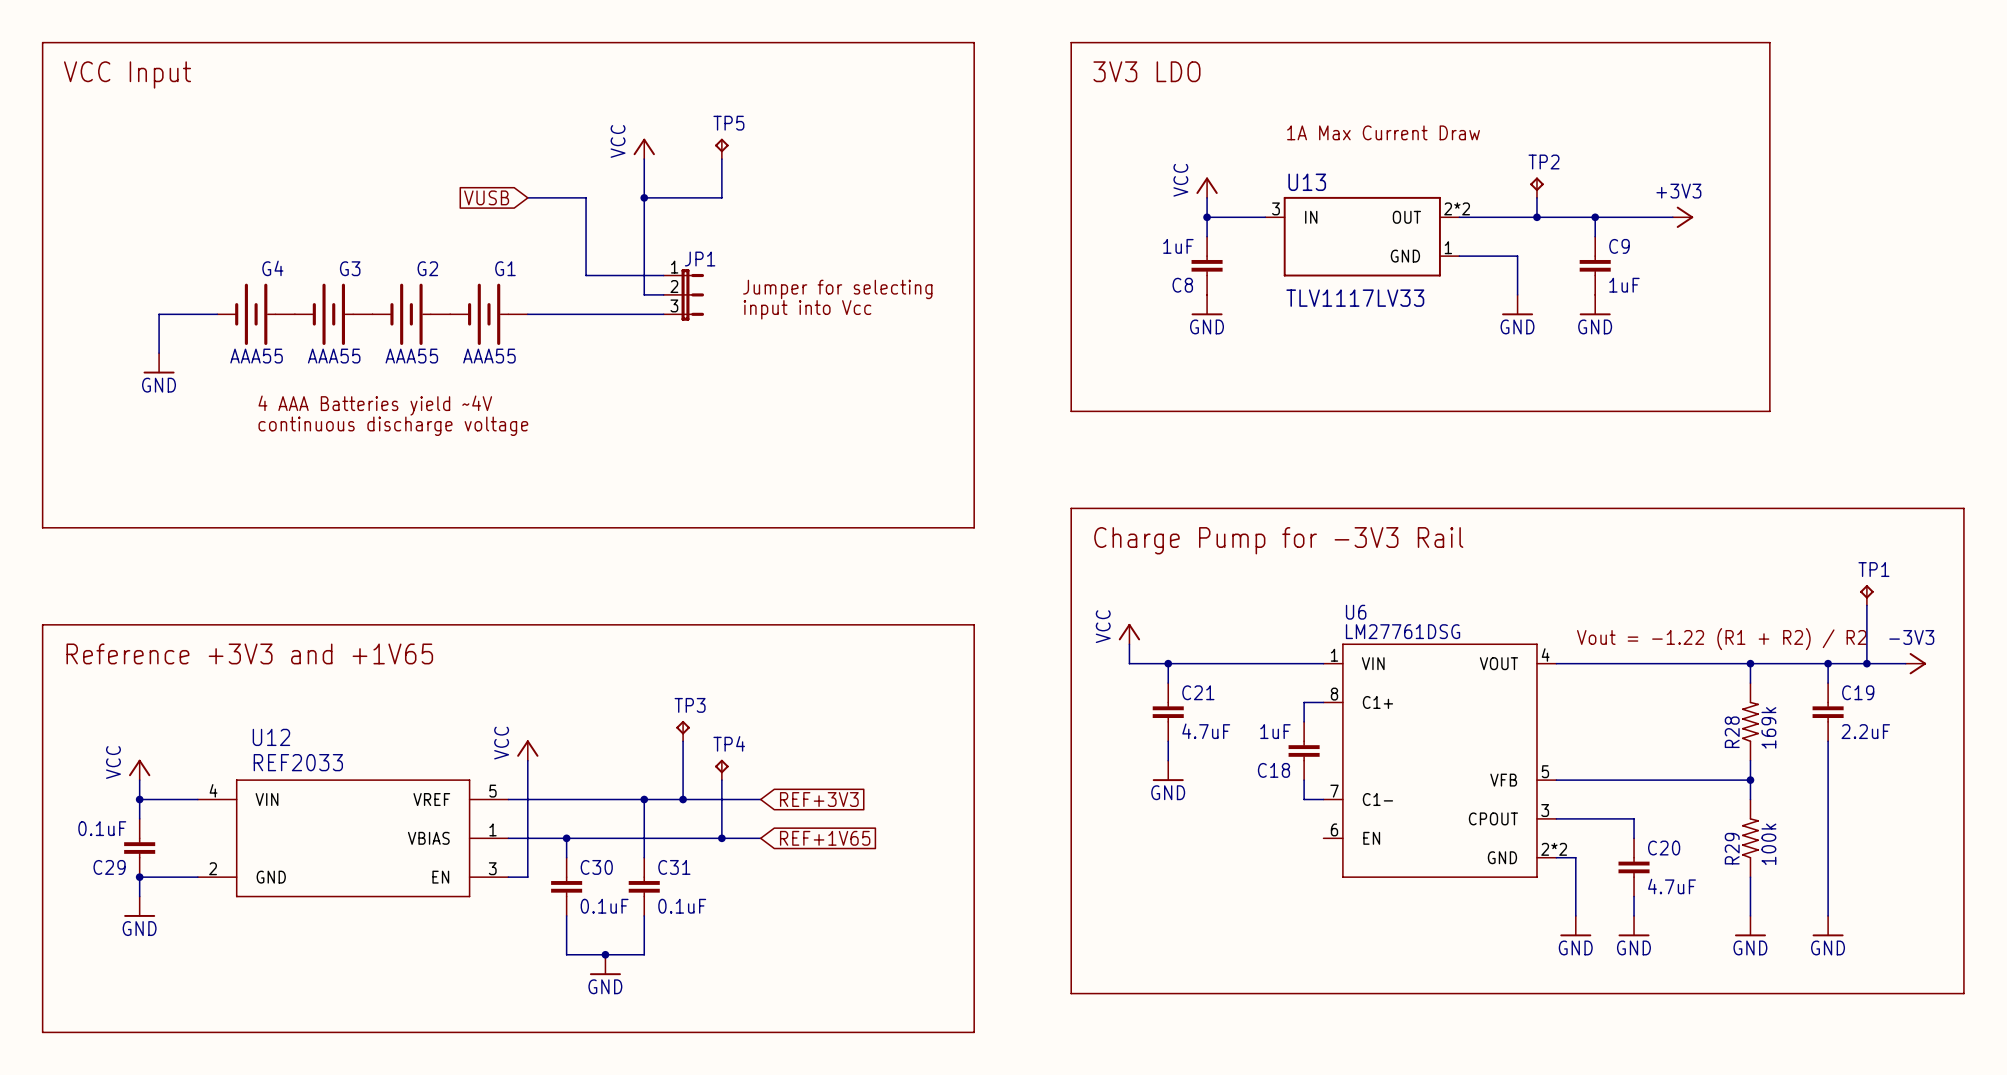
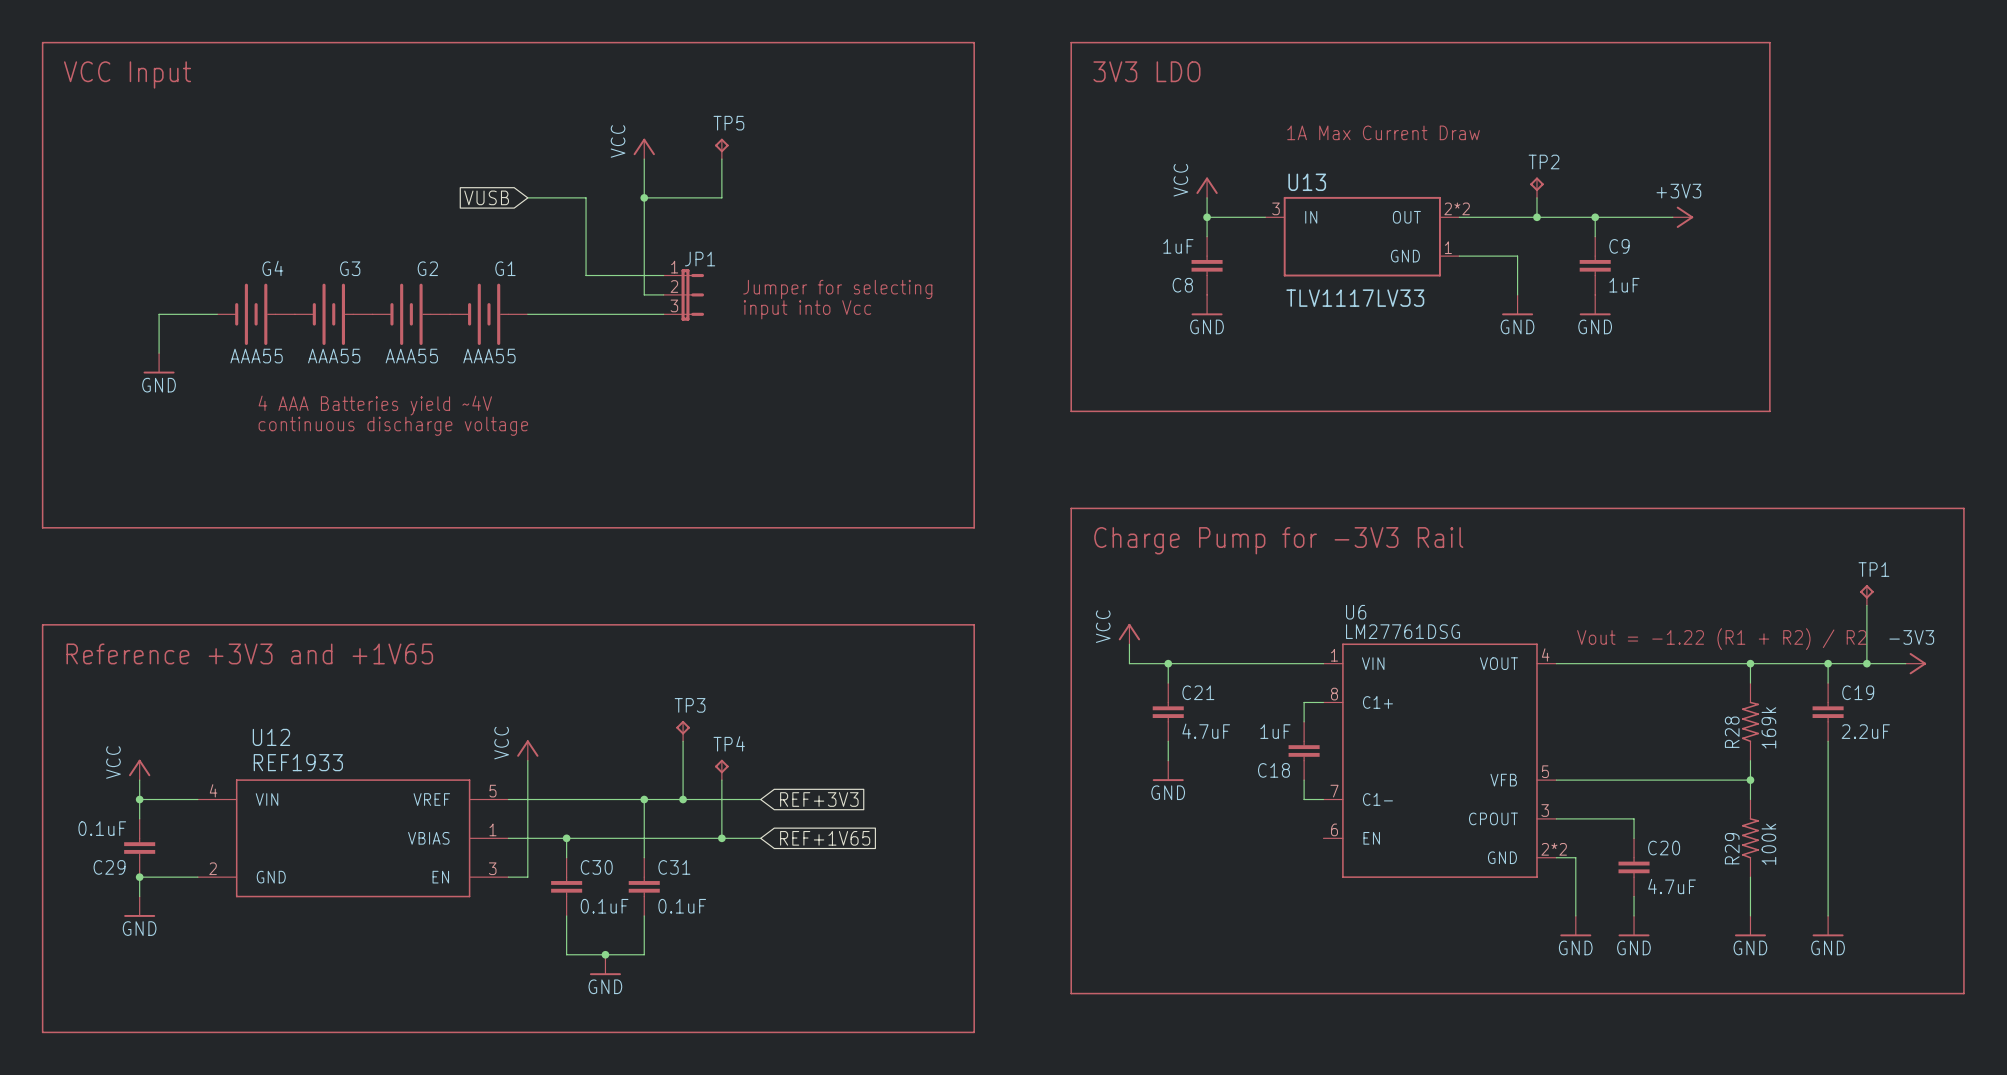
U12 value: REF2033 (298, 762) -> REF1933 (298, 762)

